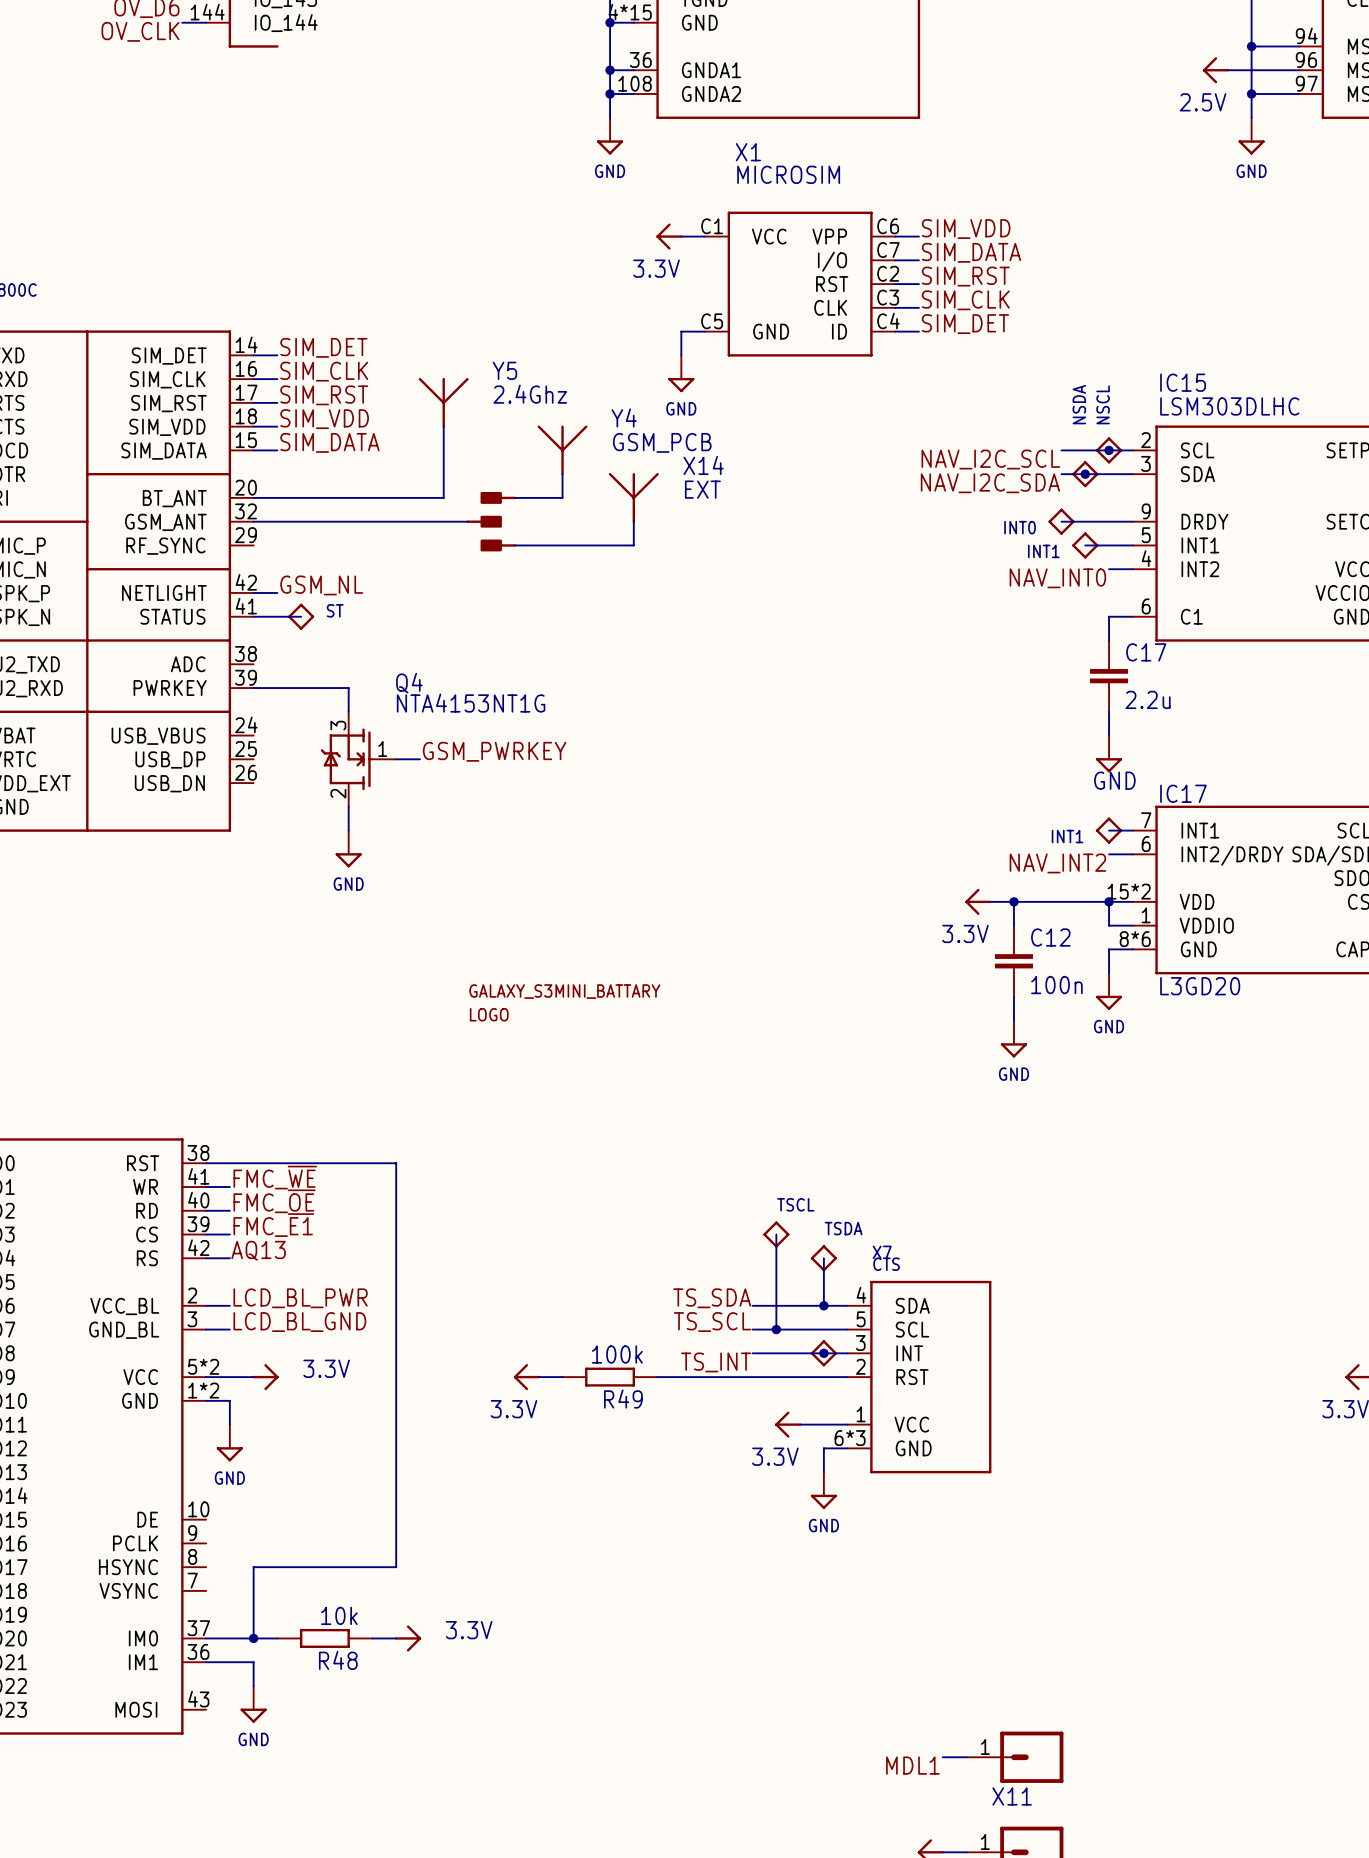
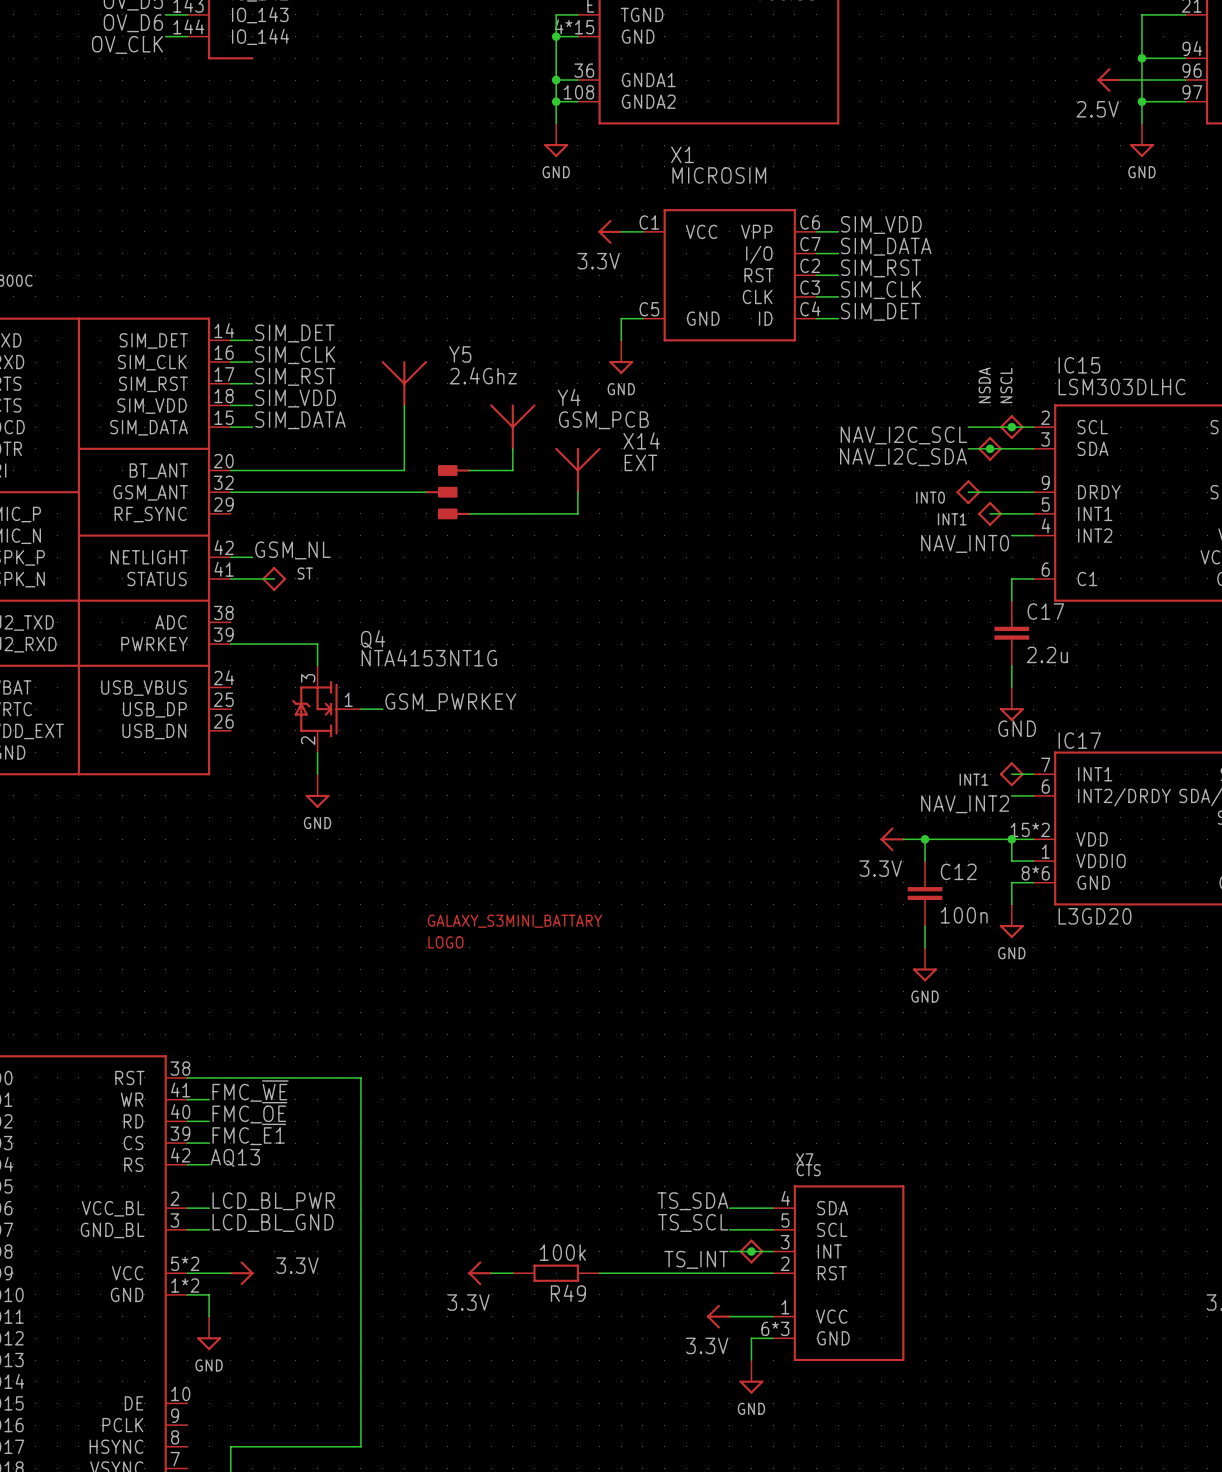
wire: (776, 1234) (776, 1329) -> none
part: TSCL (776, 1234) -> none
wire: (823, 1258) (823, 1305) -> none
part: TSDA (823, 1258) -> none
label position: TS_SDA (712, 1298) -> TS_SDA (692, 1201)
wire: (752, 1305) (800, 1305) -> none
junction: (823, 1305) -> none
label position: TS_SCL (712, 1322) -> TS_SCL (693, 1222)
wire: (752, 1329) (800, 1329) -> none
junction: (776, 1329) -> none
wire: (752, 1353) (800, 1353) -> none
label position: TS_INT (716, 1362) -> TS_INT (696, 1259)

